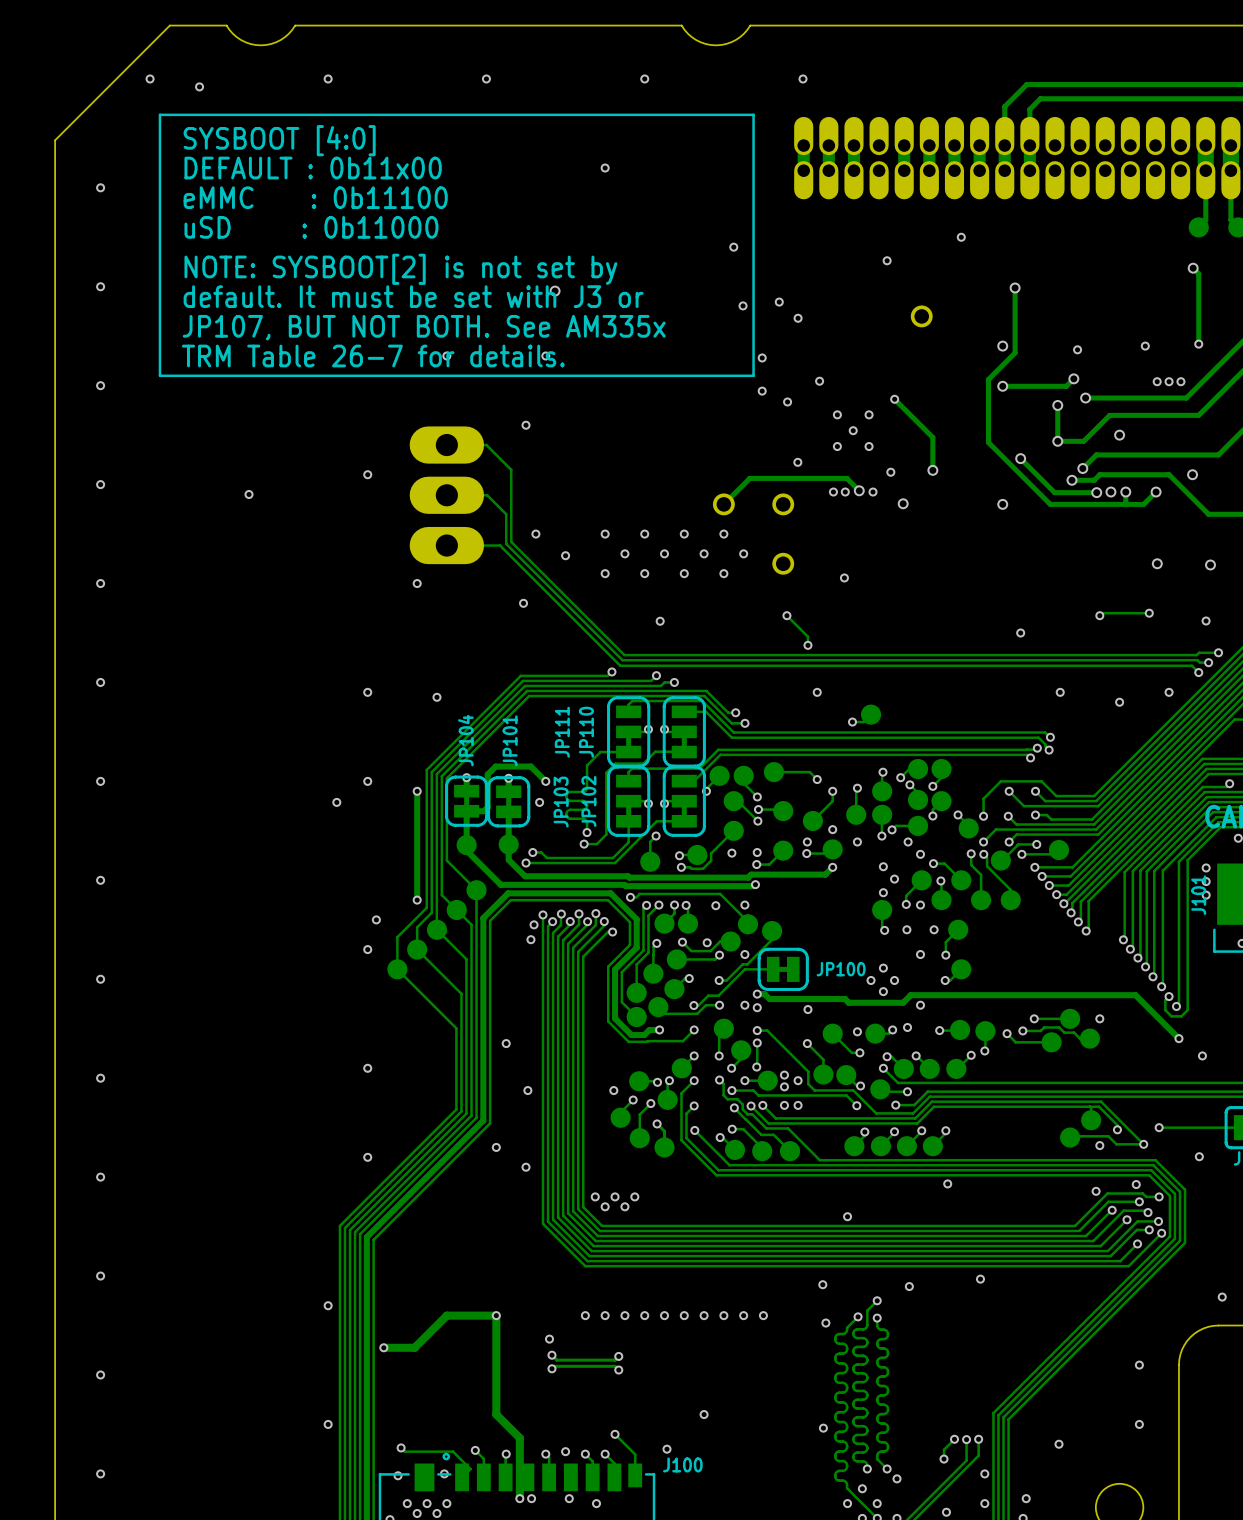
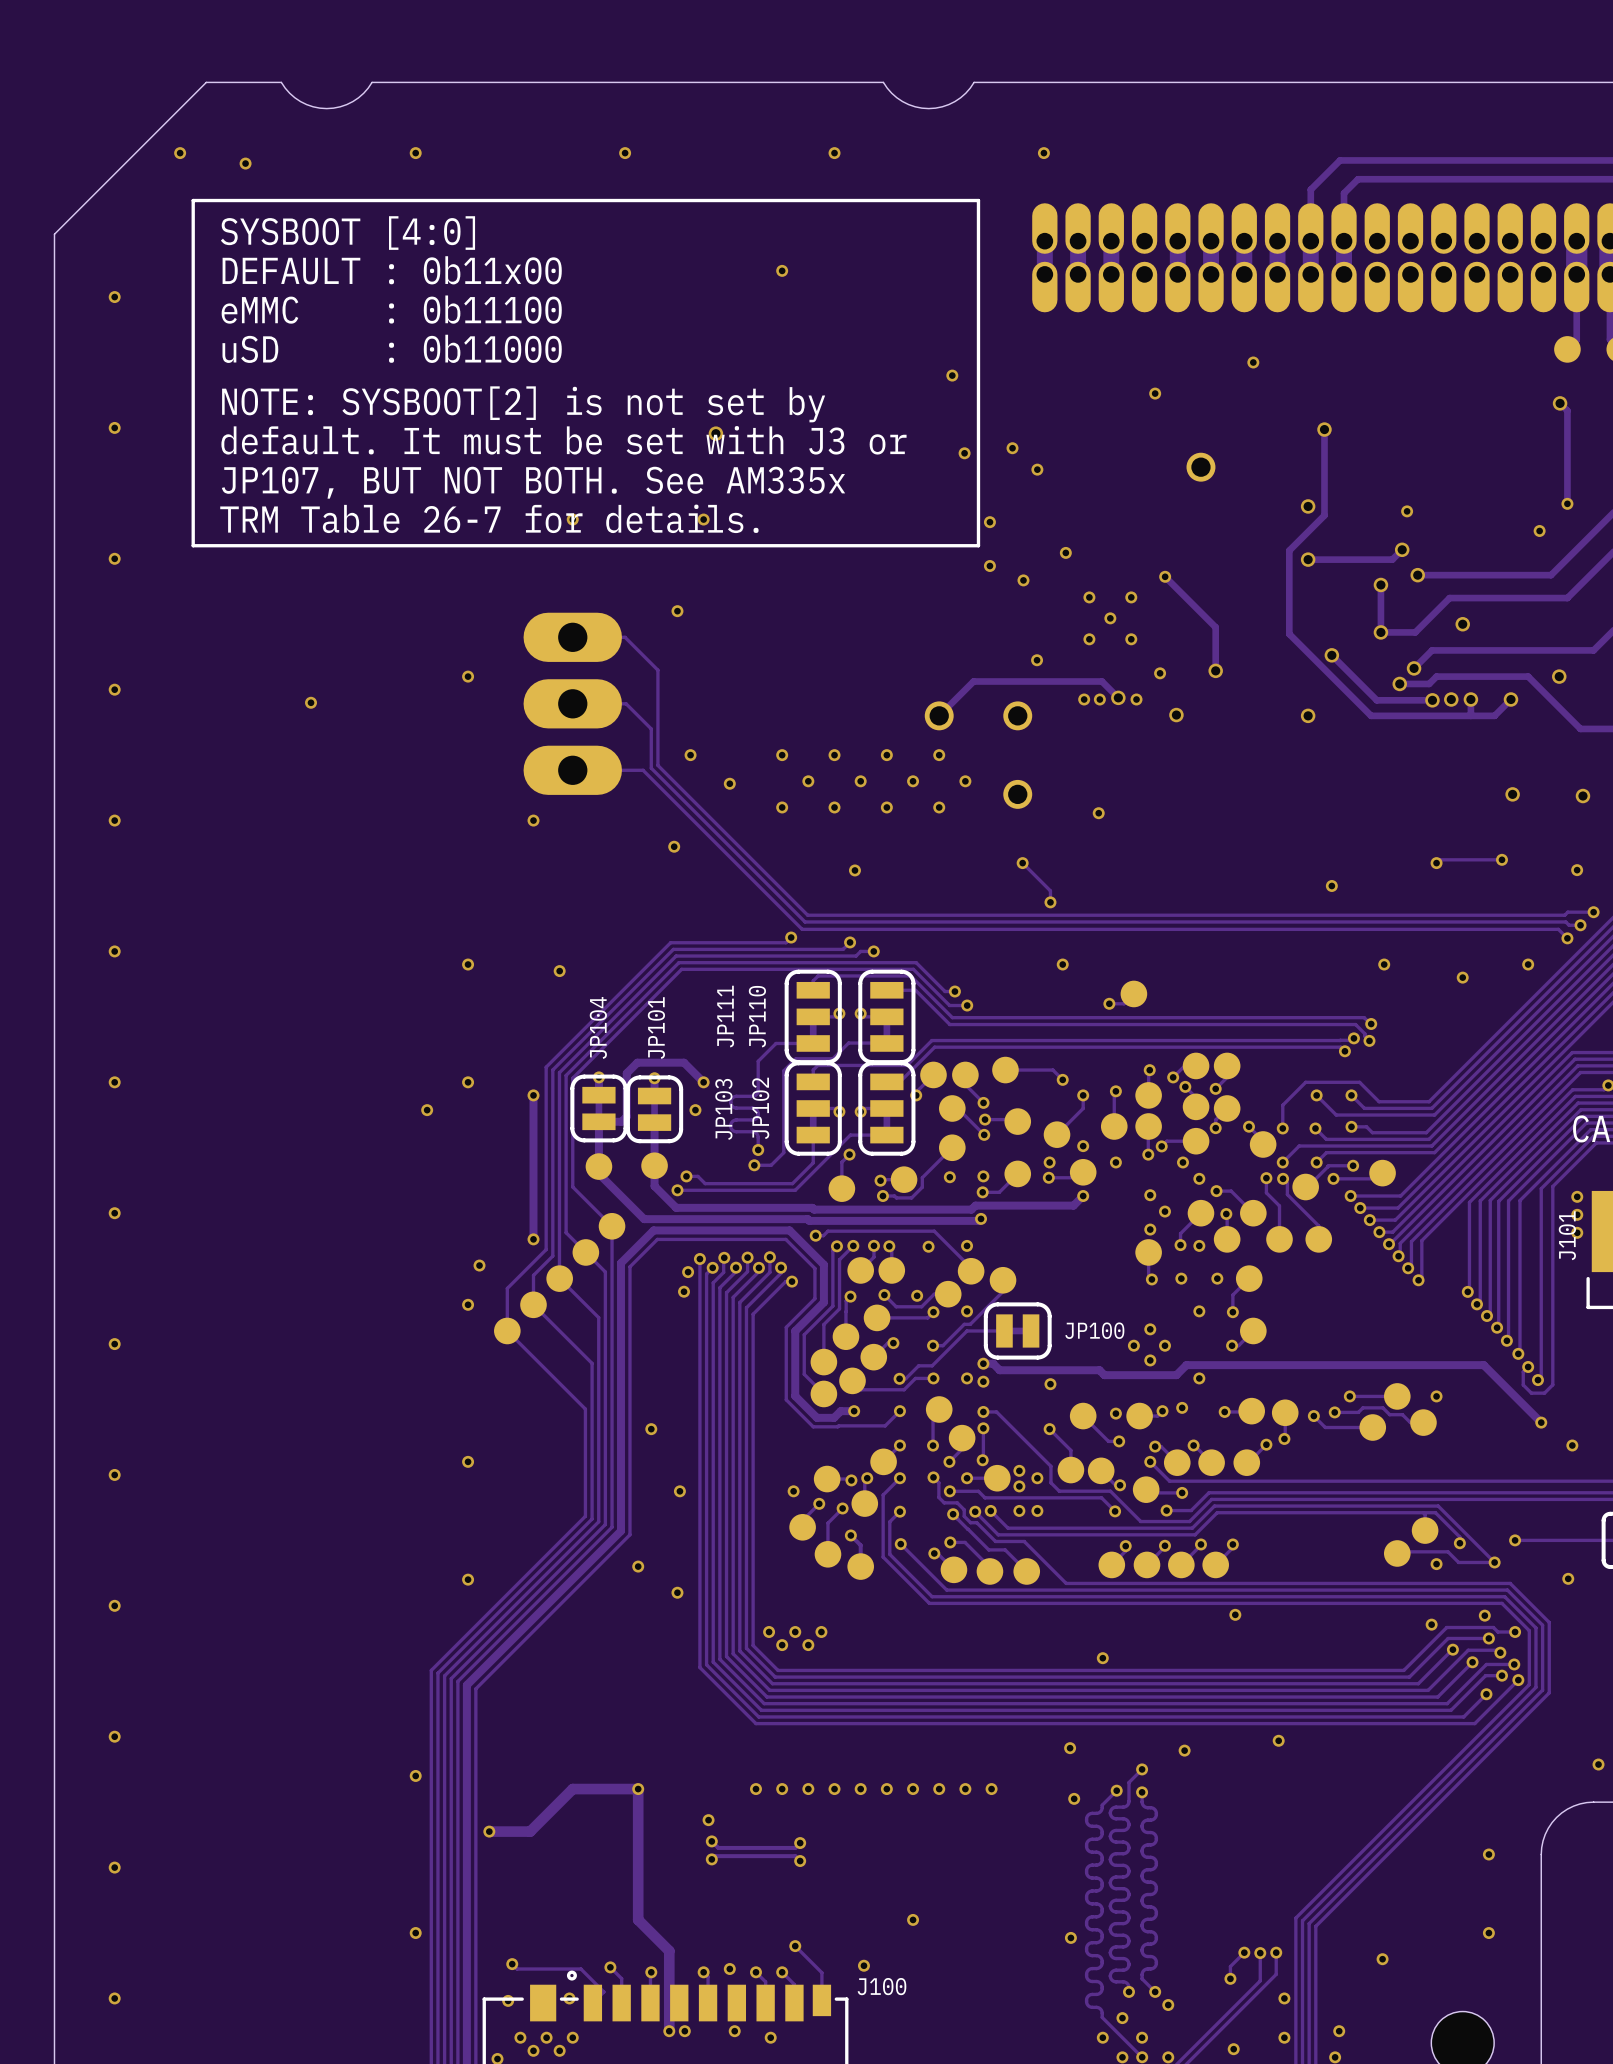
via: (1145, 346) -> none
via: none -> (1539, 530)
via: (1157, 381) -> none
via: (1169, 381) -> none
via: (1180, 381) -> none

